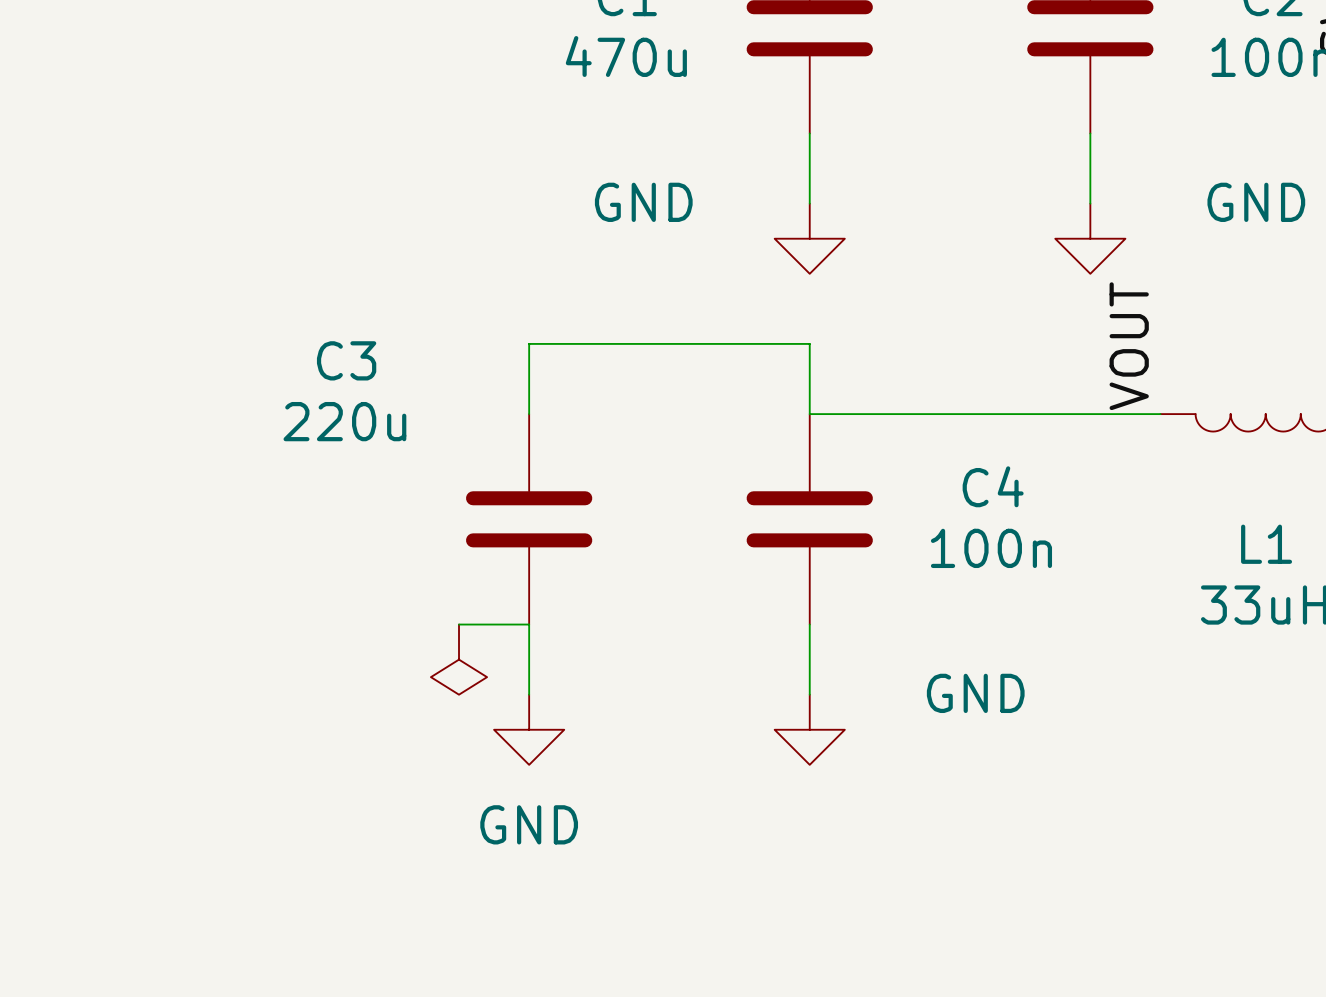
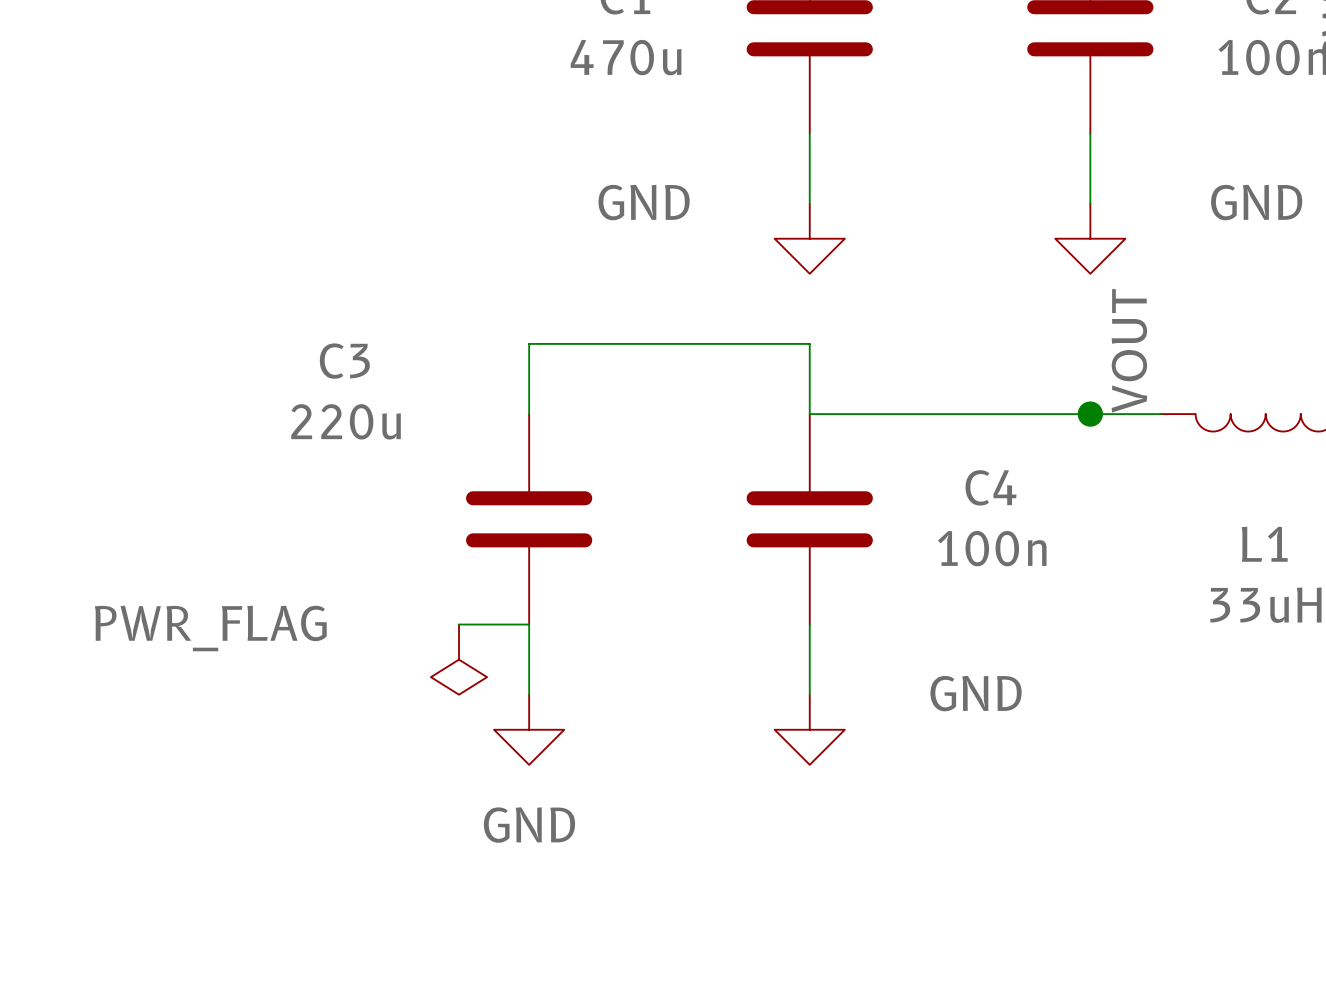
junction: none -> (1090, 414)
power symbol text: none -> PWR_FLAG (210, 628)

